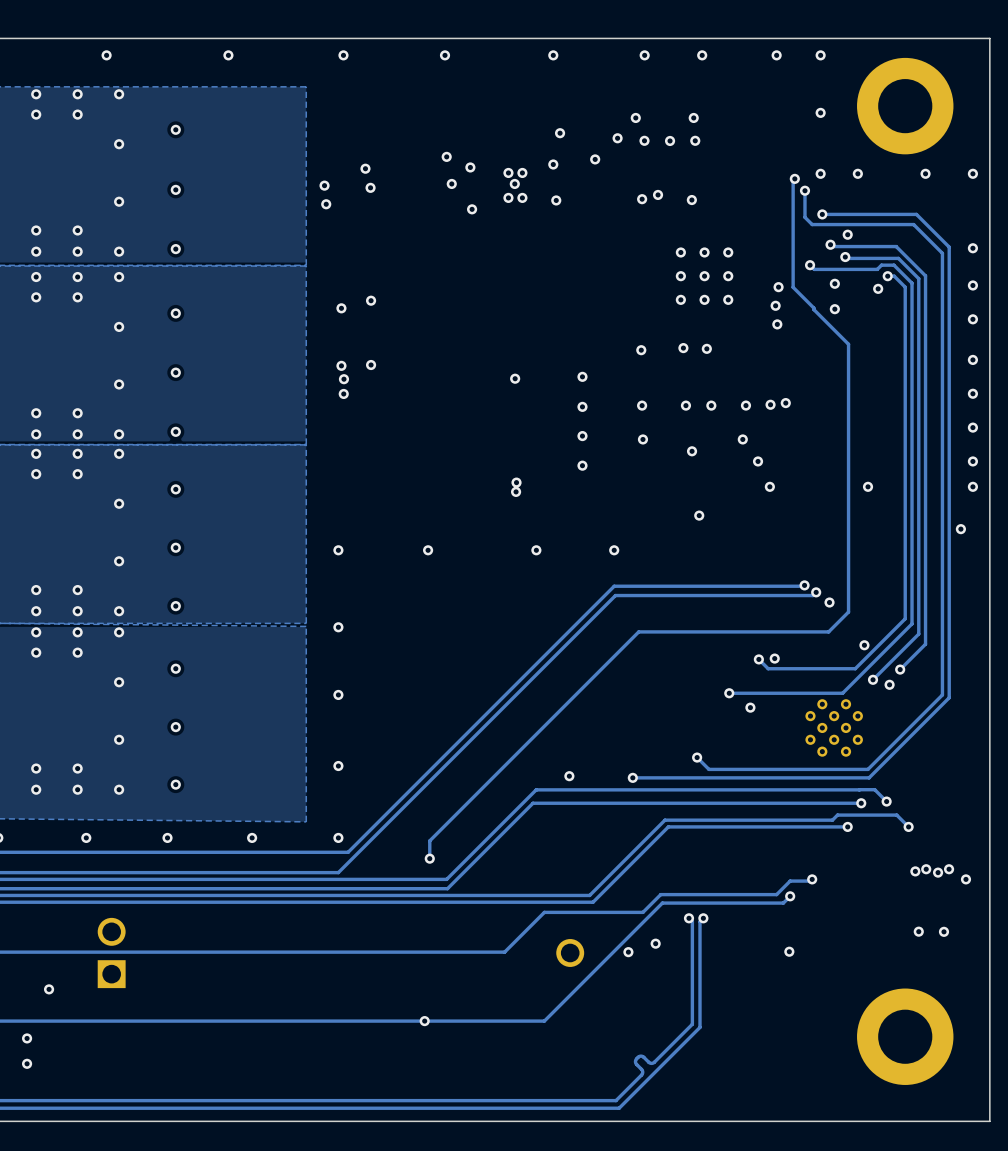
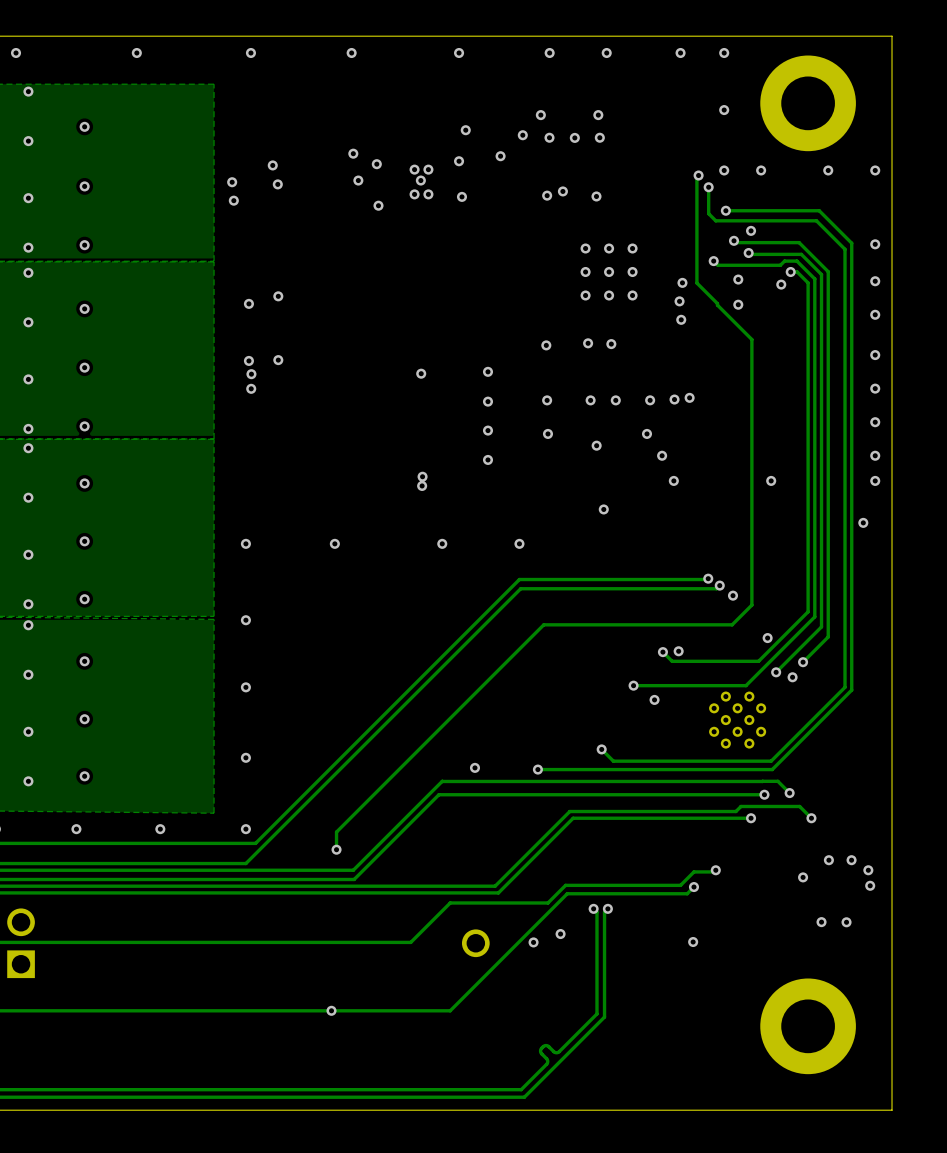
via: (915, 871) -> none
via: (938, 872) -> none
via: none -> (803, 877)
via: none -> (870, 885)

